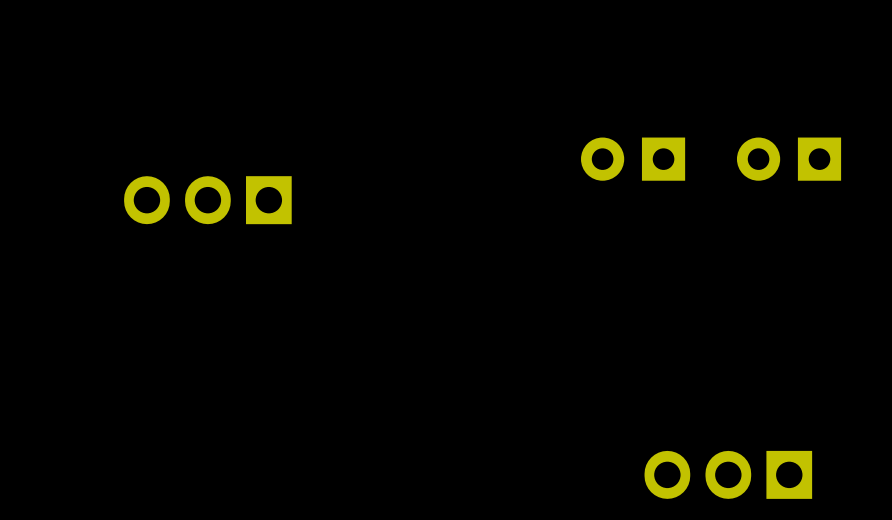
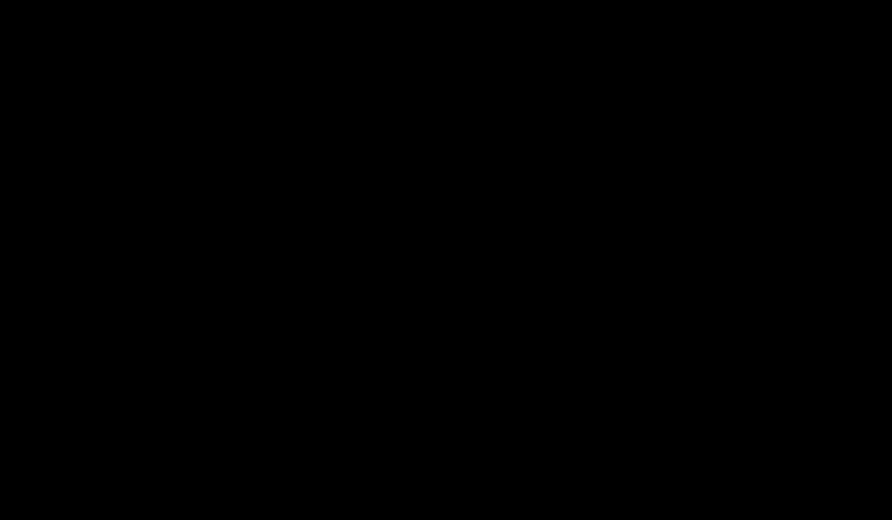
part: (633, 159) -> none
part: (789, 159) -> none
part: (207, 200) -> none
part: (728, 474) -> none

